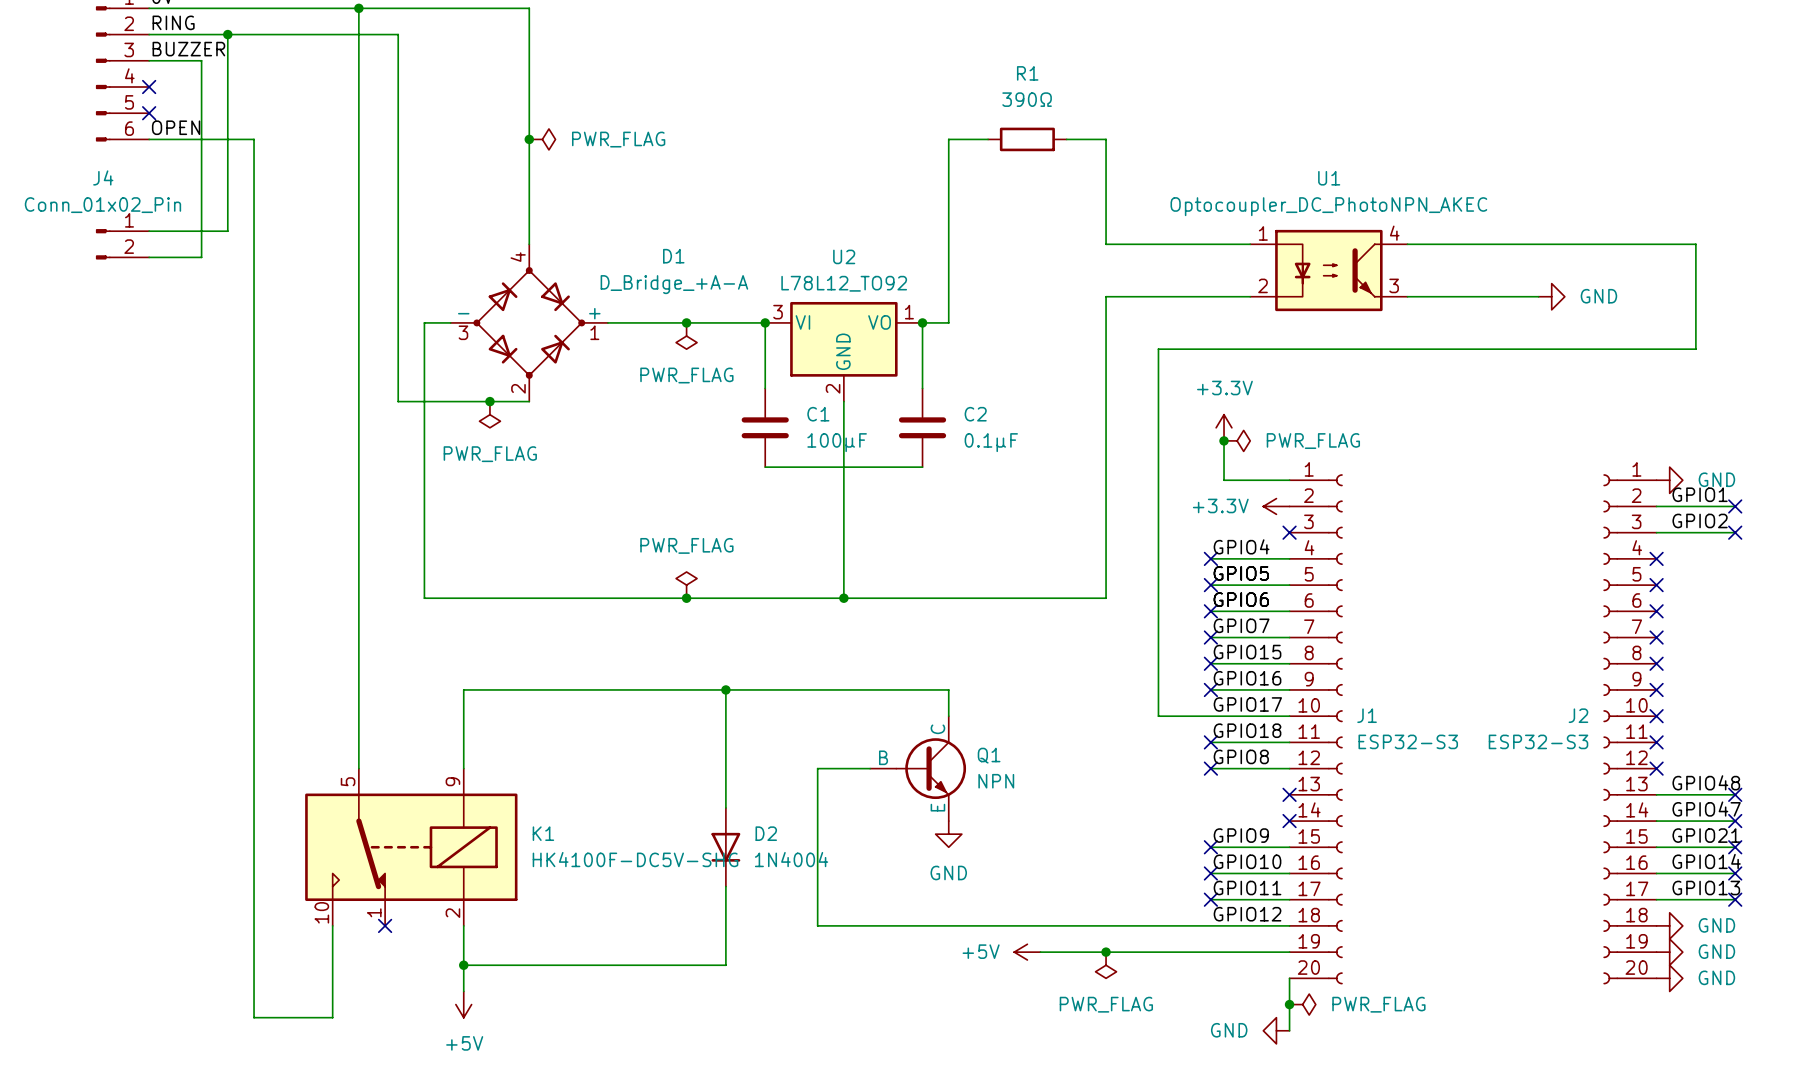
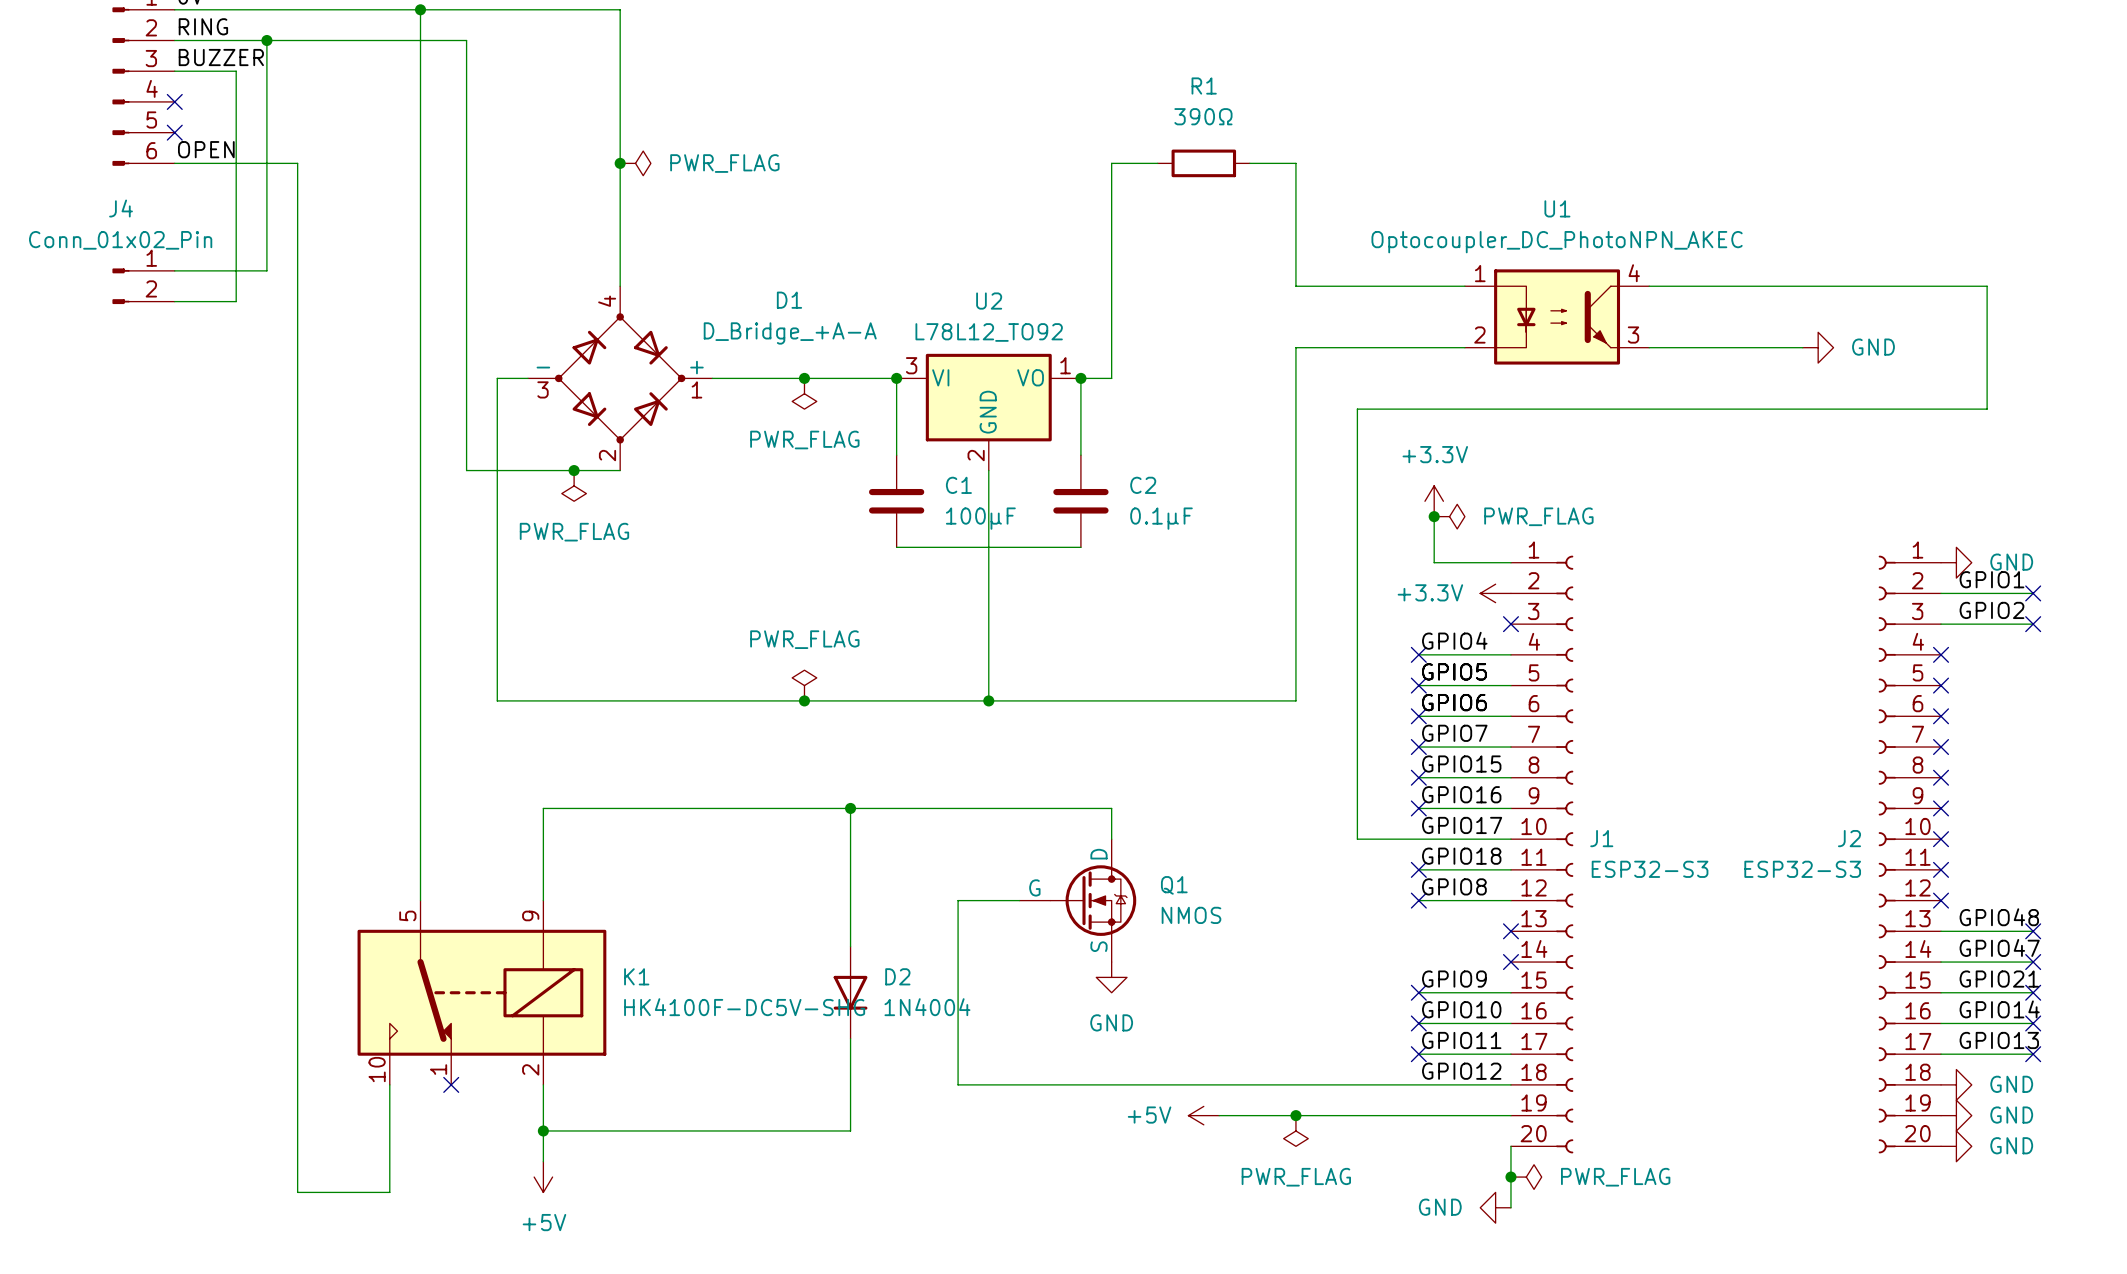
Q1 symbol: [870, 716, 967, 822] -> [1019, 839, 1137, 963]
Q1 value: NPN (996, 781) -> NMOS (1191, 915)

